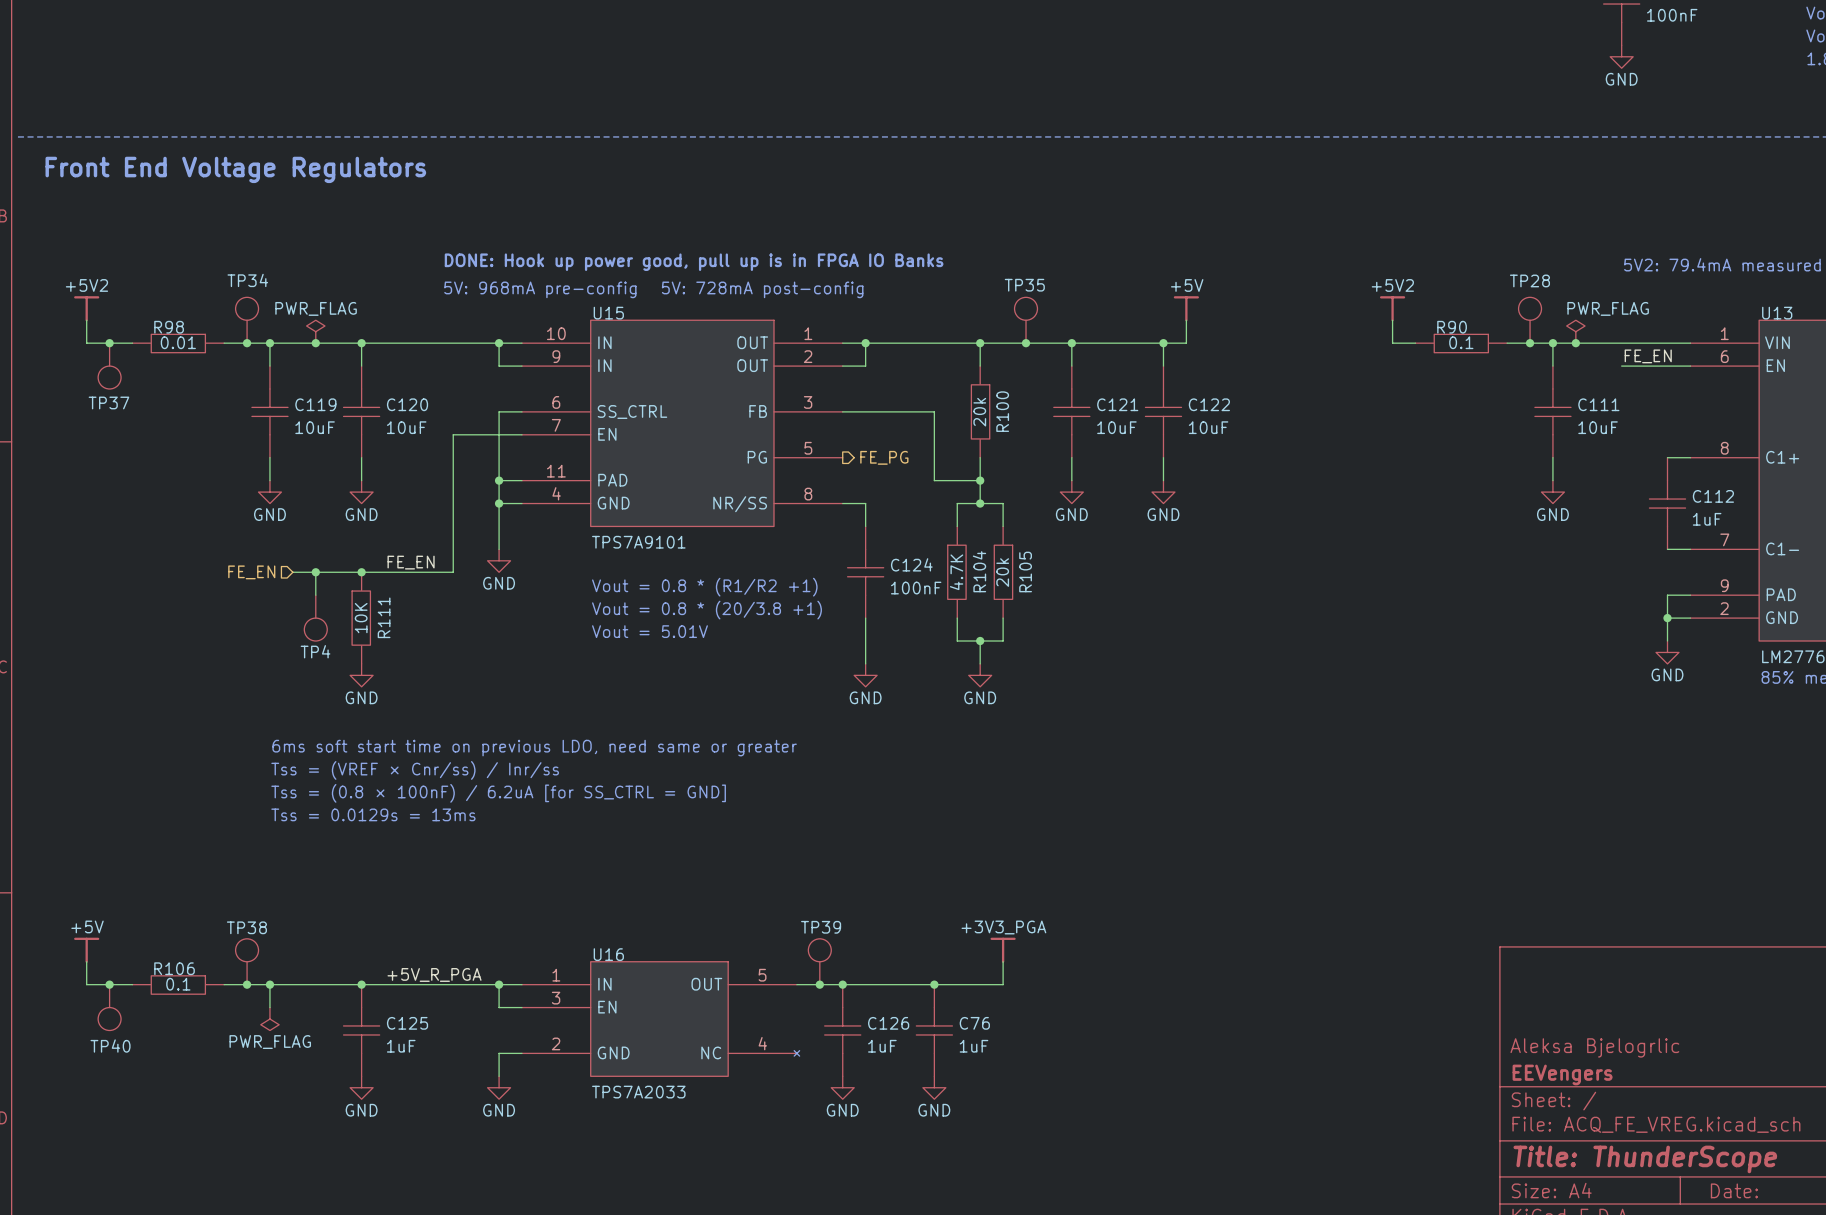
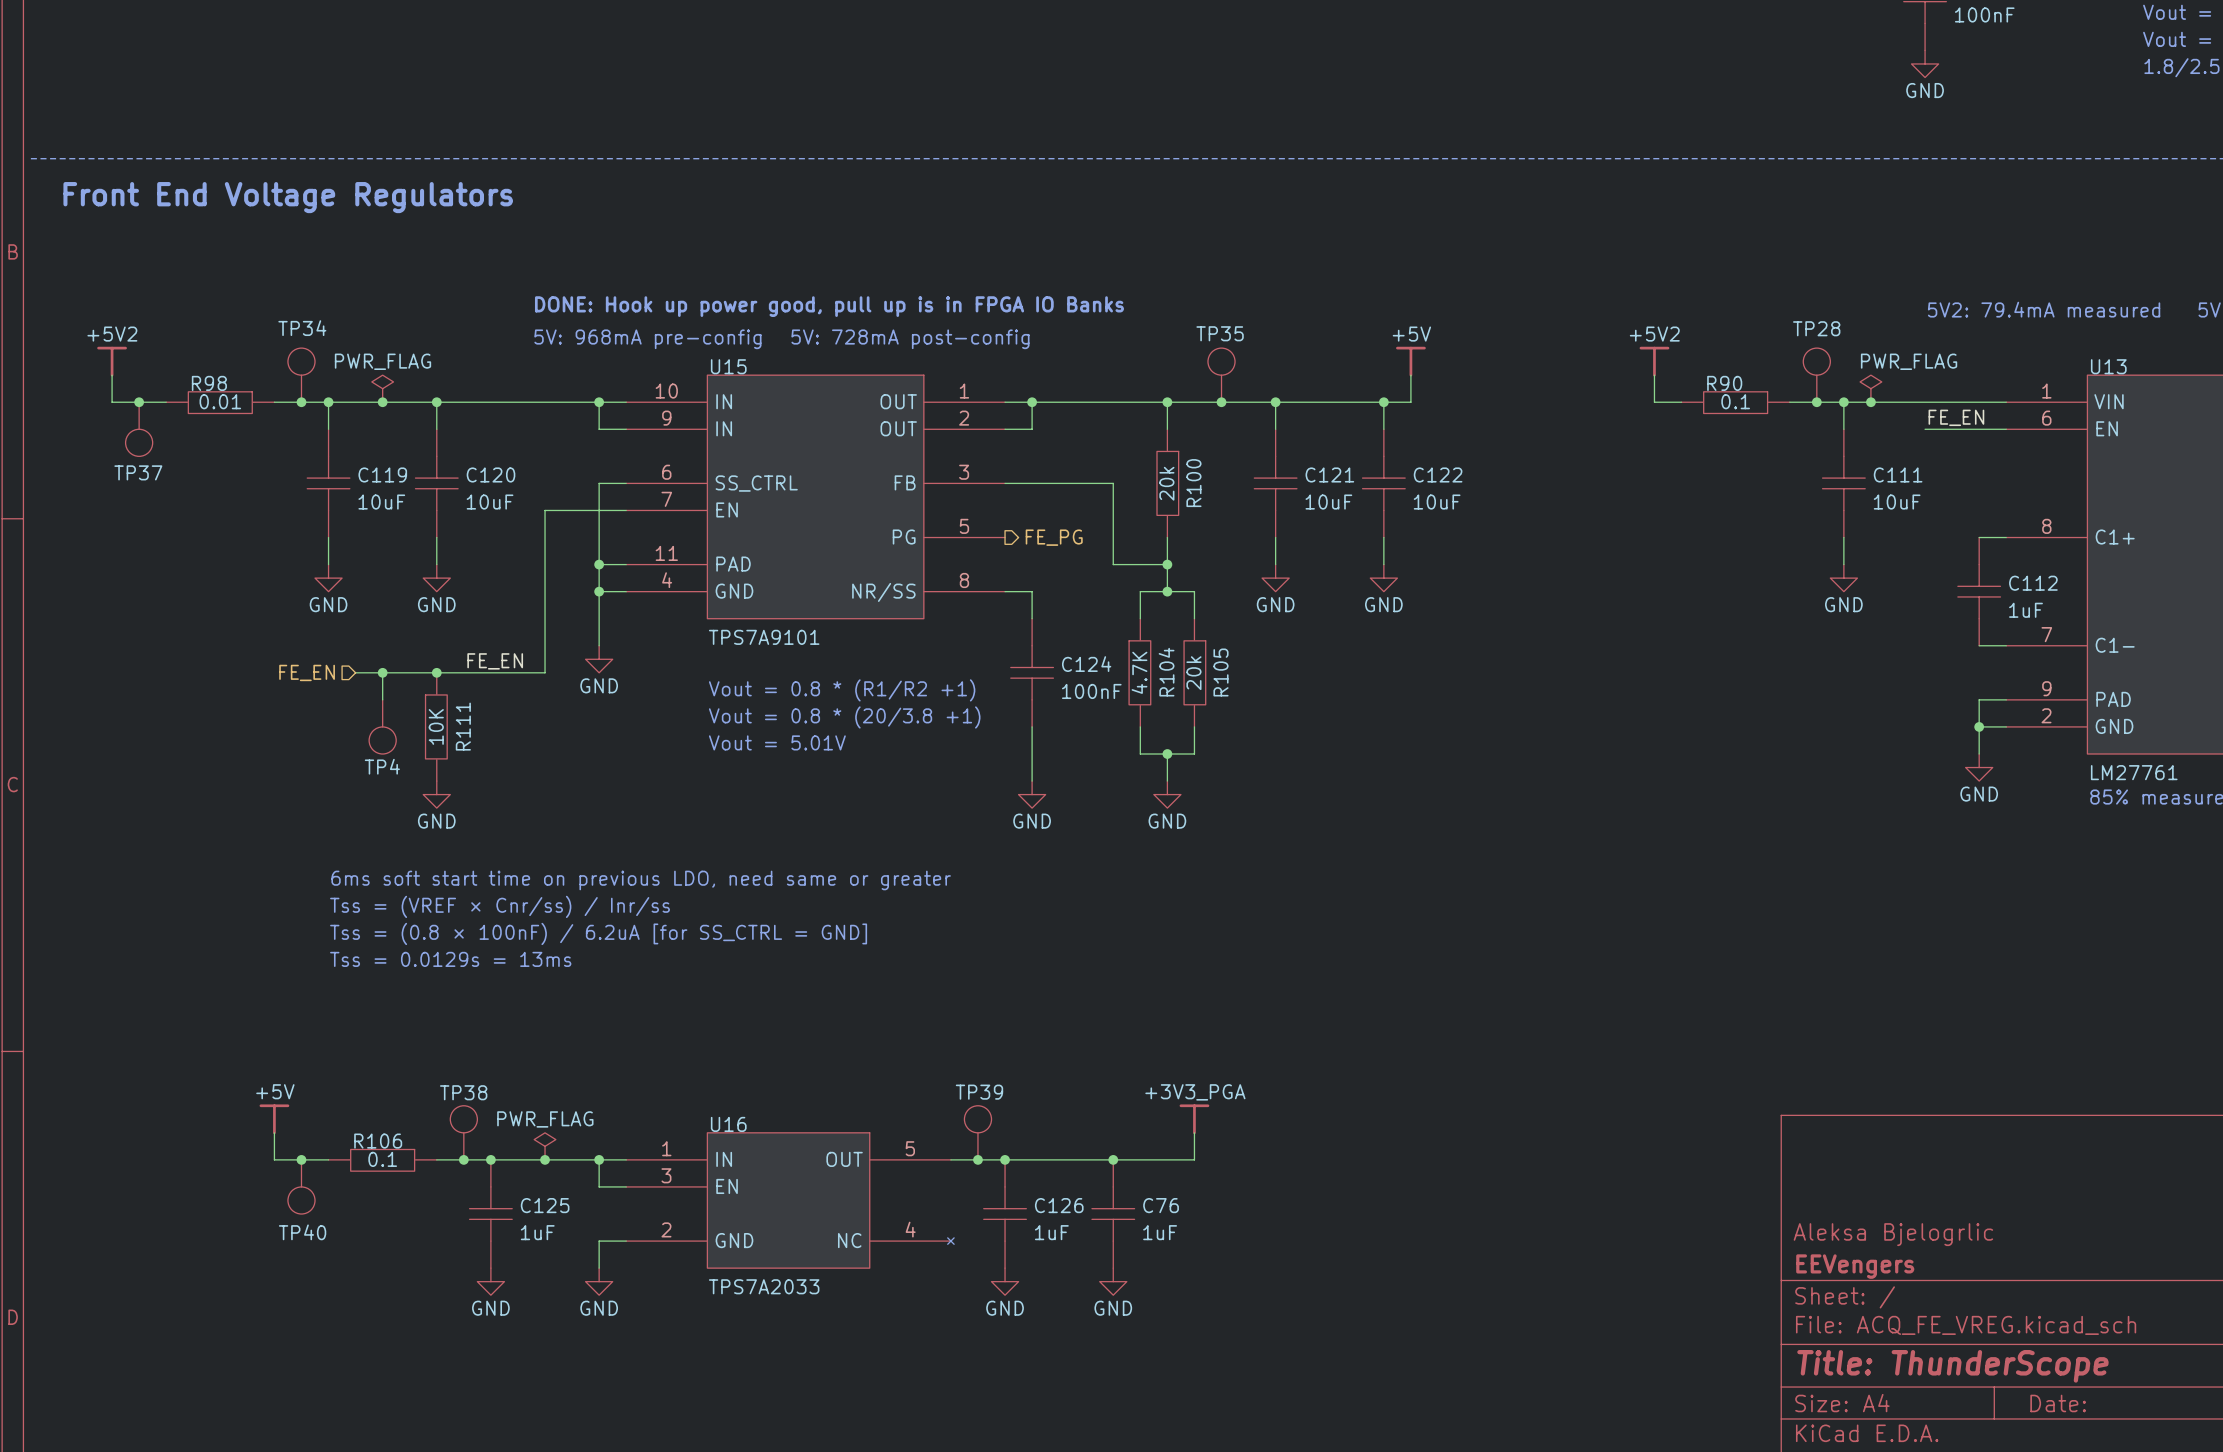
power symbol position: +5V (86, 950) -> +5V (274, 1119)
wire: (86, 961) (86, 984) (132, 984) -> none
wire: none -> (274, 1132) (274, 1159)
TP38 position: (247, 961) -> (463, 1132)
label: +5V_R_PGA (434, 974) -> none
junction: (109, 984) -> none
junction: (269, 984) -> none
wire: (361, 984) (269, 984) (269, 1007) -> none
junction: (361, 984) -> none
junction: none -> (463, 1159)
junction: none -> (490, 1159)
junction: none -> (545, 1159)
R106 position: (178, 985) -> (382, 1160)
TP40 position: (109, 1007) -> (301, 1186)
power symbol rotation: 0° (269, 1019) -> 180° (545, 1146)
power symbol position: PWR_FLAG (269, 1019) -> PWR_FLAG (545, 1146)
C125 position: (361, 1030) -> (490, 1214)
power symbol position: GND (361, 1087) -> GND (490, 1281)

